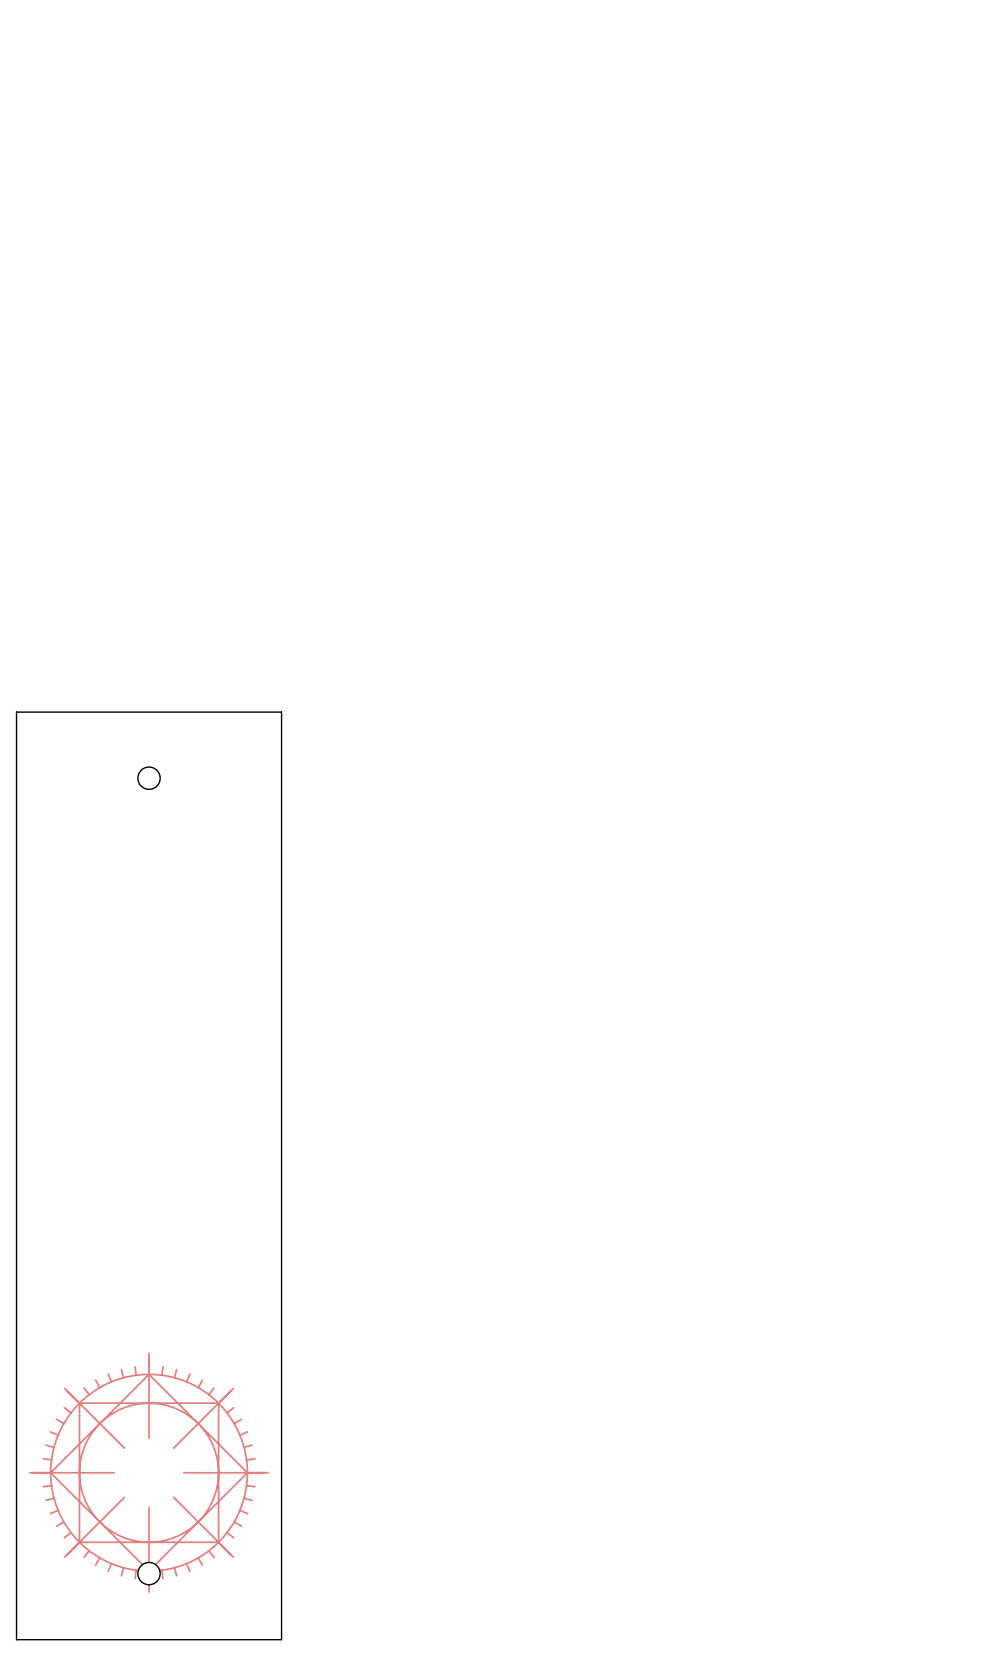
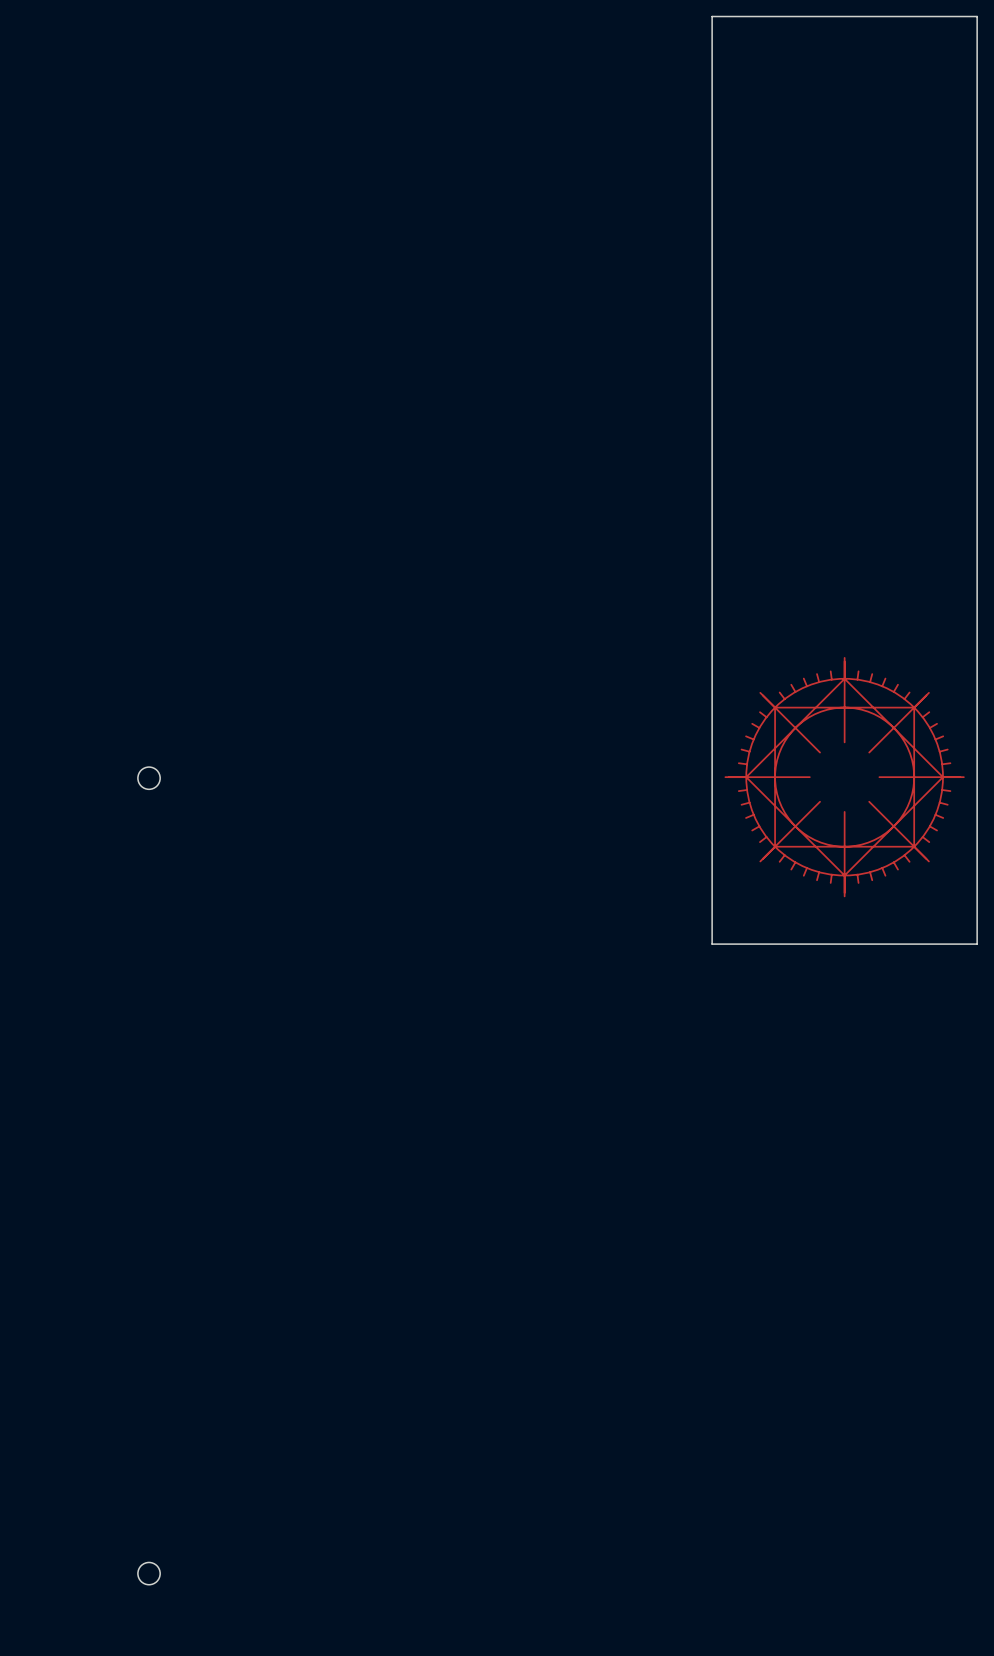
board edge: none -> (977, 16) (712, 16) (712, 944) (977, 944) (977, 16)
drawing: none -> [724, 657, 965, 898]
board edge: (281, 712) (16, 712) (16, 1639) (281, 1639) (281, 712) -> none
drawing: [28, 1352, 270, 1593] -> none

